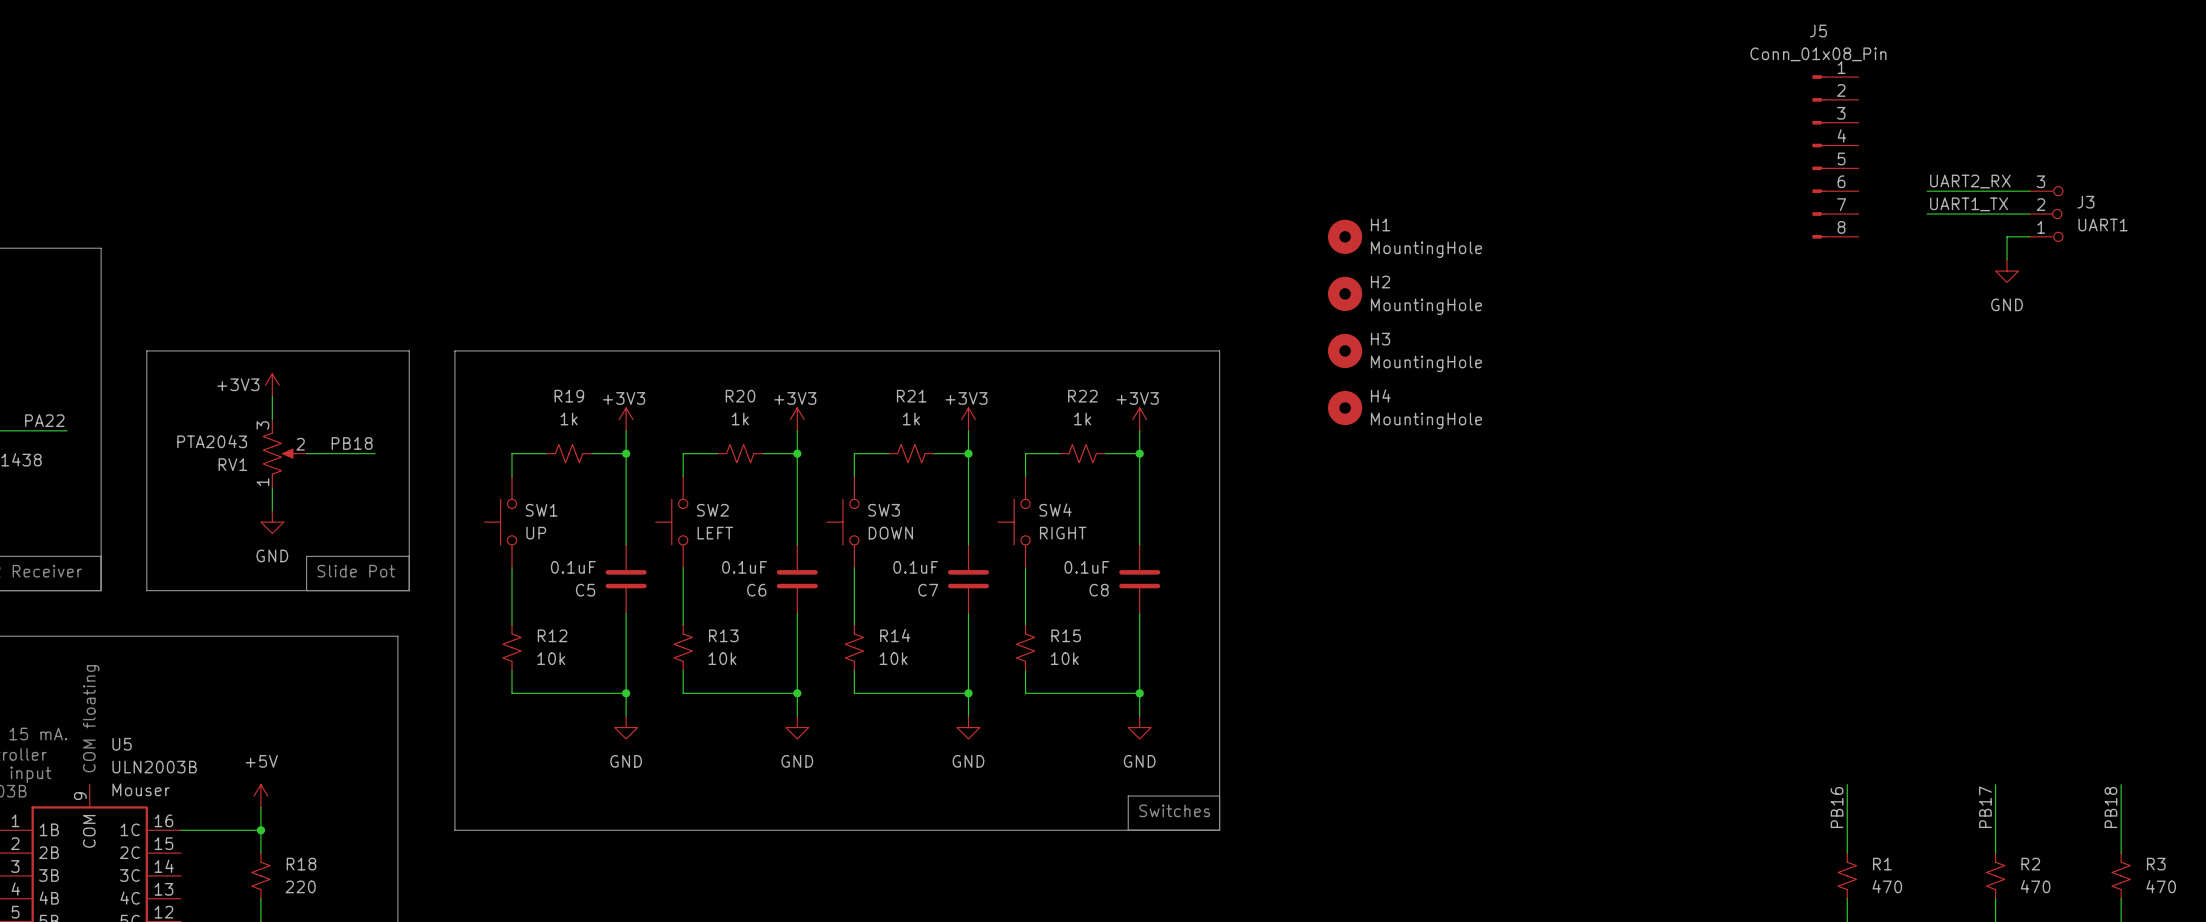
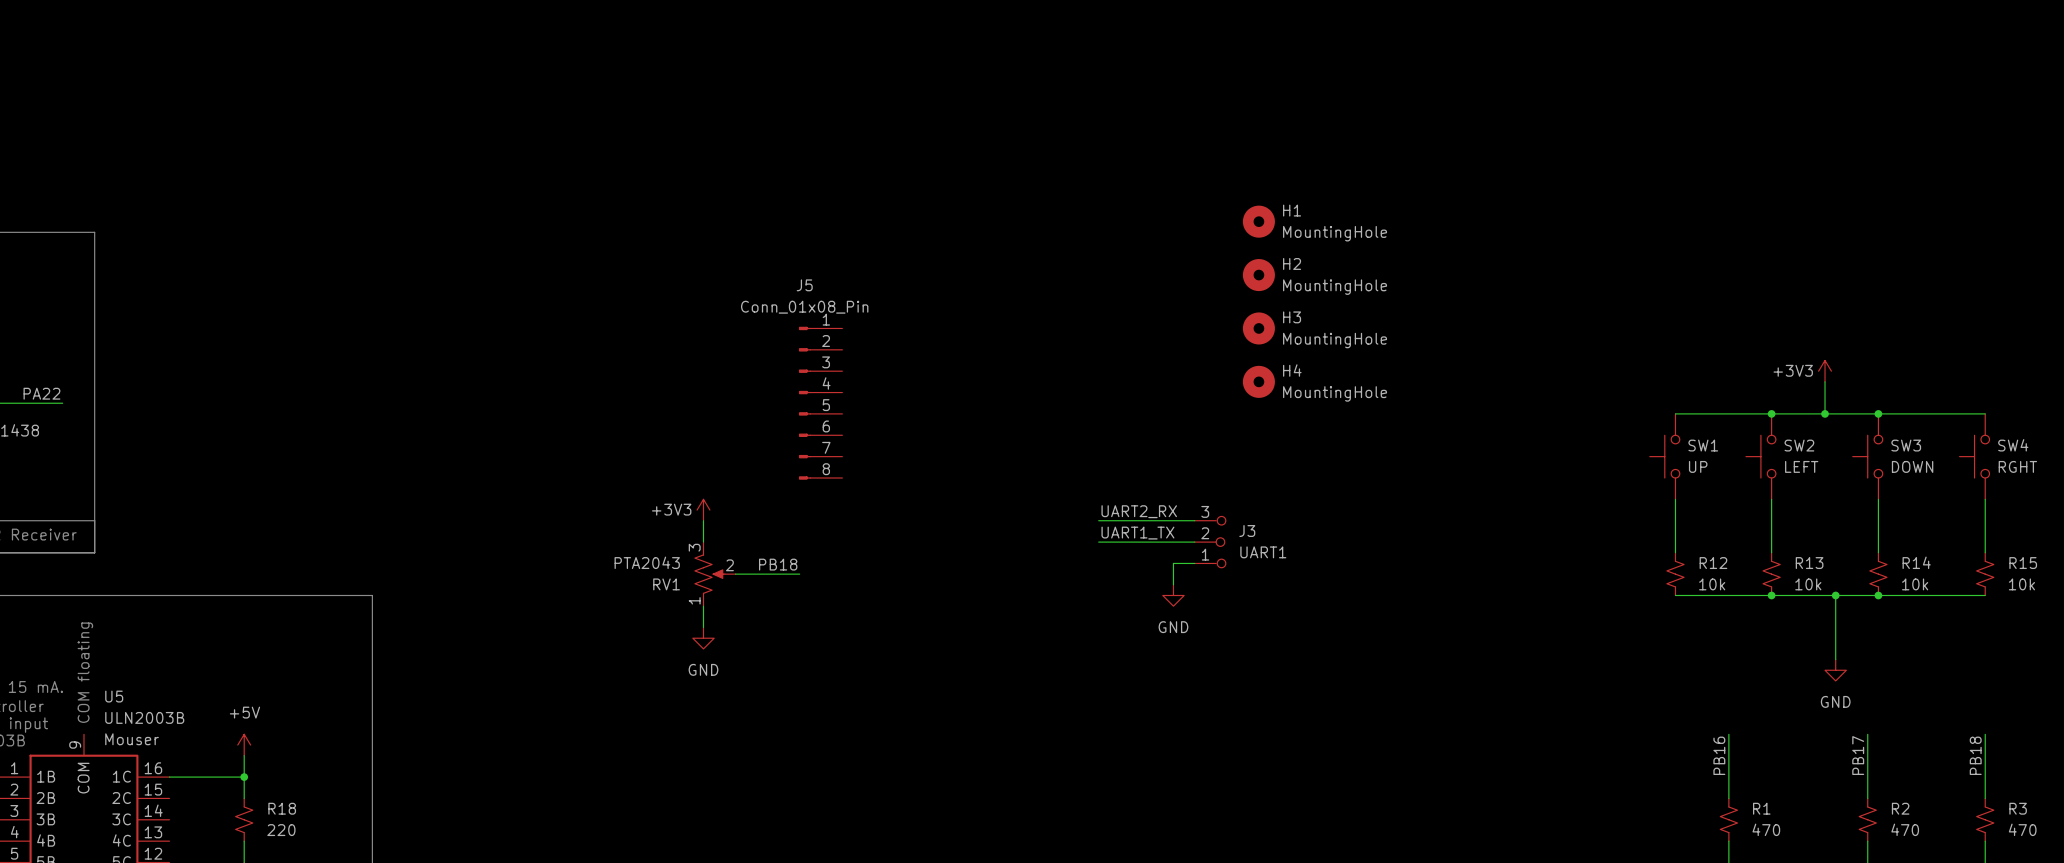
J5 position: (1835, 156) -> (820, 403)
label: UART2_RX (1970, 181) -> none
wire: (1927, 191) (2029, 191) -> none
label: UART1_TX (1969, 204) -> none
wire: (1927, 214) (2029, 214) -> none
J3 position: (2046, 214) -> (1210, 542)
wire: (2029, 236) (2007, 236) (2007, 259) -> none
power symbol: GND (2007, 271) -> none
line: (146, 350) (409, 350) (409, 590) (146, 590) (146, 350) -> none
line: (454, 350) (1219, 350) (1219, 830) (454, 830) (454, 350) -> none
power symbol: +3V3 (272, 385) -> none
wire: (272, 396) (272, 419) -> none
power symbol: none -> +3V3 (1825, 371)
wire: none -> (1825, 381) (1825, 413)
power symbol: +3V3 (626, 419) -> none
power symbol: +3V3 (797, 419) -> none
power symbol: +3V3 (968, 419) -> none
power symbol: +3V3 (1139, 419) -> none
wire: (626, 430) (626, 544) -> none
wire: (797, 430) (797, 544) -> none
wire: (968, 430) (968, 544) -> none
wire: (1139, 430) (1139, 544) -> none
wire: none -> (1675, 413) (1985, 413)
junction: none -> (1771, 413)
junction: none -> (1825, 413)
junction: none -> (1878, 413)
label: PB18 (352, 443) -> none
RV1 position: (284, 453) -> (715, 574)
wire: (306, 453) (375, 453) -> none
wire: (546, 453) (512, 453) (512, 476) -> none
R19: 1k (569, 453) -> none
wire: (591, 453) (626, 453) -> none
junction: (626, 453) -> none
wire: (717, 453) (683, 453) (683, 476) -> none
R20: 1k (740, 453) -> none
wire: (763, 453) (797, 453) -> none
junction: (797, 453) -> none
wire: (888, 453) (854, 453) (854, 476) -> none
R21: 1k (911, 453) -> none
wire: (934, 453) (968, 453) -> none
junction: (968, 453) -> none
wire: (1059, 453) (1025, 453) (1025, 476) -> none
R22: 1k (1082, 453) -> none
wire: (1105, 453) (1139, 453) -> none
junction: (1139, 453) -> none
wire: (272, 487) (272, 510) -> none
power symbol: GND (272, 522) -> none
SW1 position: (500, 522) -> (1664, 456)
SW2 position: (671, 522) -> (1760, 456)
SW3 position: (842, 522) -> (1867, 456)
SW4 position: (1014, 522) -> (1974, 456)
SW4 value: RIGHT (1063, 533) -> RGHT (2017, 466)
wire: none -> (1675, 499) (1675, 552)
wire: none -> (1771, 499) (1771, 552)
wire: none -> (1878, 499) (1878, 552)
wire: none -> (1985, 499) (1985, 552)
power symbol: none -> +3V3 (703, 510)
label: none -> UART2_RX (1139, 511)
line: (409, 556) (306, 556) (306, 590) -> none
wire: none -> (703, 520) (703, 542)
wire: none -> (1098, 520) (1194, 520)
wire: (512, 567) (512, 624) -> none
wire: (683, 567) (683, 624) -> none
wire: (854, 567) (854, 624) -> none
wire: (1025, 567) (1025, 624) -> none
label: none -> UART1_TX (1137, 533)
text: Slide Pot (356, 571) -> none
C5: 0.1uF (626, 579) -> none
C6: 0.1uF (797, 579) -> none
C7: 0.1uF (968, 579) -> none
C8: 0.1uF (1139, 579) -> none
wire: none -> (1098, 542) (1194, 542)
wire: none -> (1194, 563) (1173, 563) (1173, 584)
label: none -> PB18 (778, 564)
wire: (626, 613) (626, 716) -> none
wire: none -> (735, 574) (799, 574)
wire: (797, 613) (797, 716) -> none
wire: (968, 613) (968, 716) -> none
wire: (1139, 613) (1139, 716) -> none
wire: none -> (1675, 595) (1985, 595)
junction: none -> (1771, 595)
wire: none -> (1835, 595) (1835, 659)
junction: none -> (1835, 595)
junction: none -> (1878, 595)
R12 position: (512, 647) -> (1675, 574)
R13 position: (683, 647) -> (1771, 574)
wire: none -> (703, 606) (703, 627)
R14 position: (854, 647) -> (1878, 574)
R15 position: (1025, 647) -> (1985, 574)
wire: (512, 670) (512, 693) (626, 693) -> none
wire: (683, 670) (683, 693) (797, 693) -> none
wire: (854, 670) (854, 693) (968, 693) -> none
wire: (1025, 670) (1025, 693) (1139, 693) -> none
junction: (626, 693) -> none
junction: (797, 693) -> none
junction: (968, 693) -> none
junction: (1139, 693) -> none
power symbol: none -> GND (1835, 670)
power symbol: GND (626, 727) -> none
power symbol position: GND (797, 727) -> GND (703, 638)
power symbol: GND (968, 727) -> none
power symbol position: GND (1139, 727) -> GND (1173, 595)
line: (1219, 796) (1128, 796) (1128, 830) -> none
text: Switches (1174, 810) -> none

